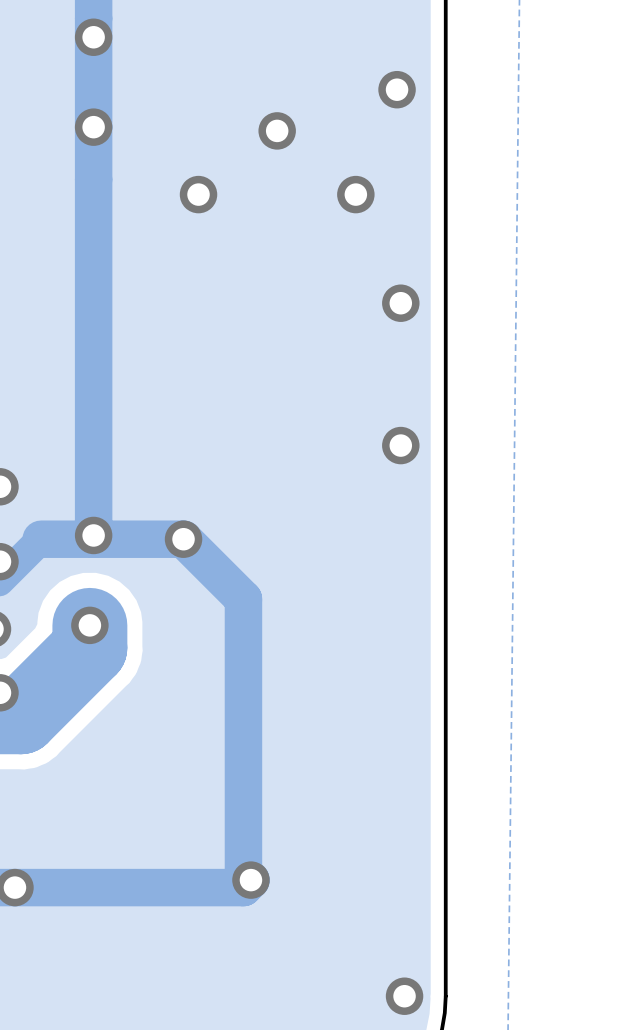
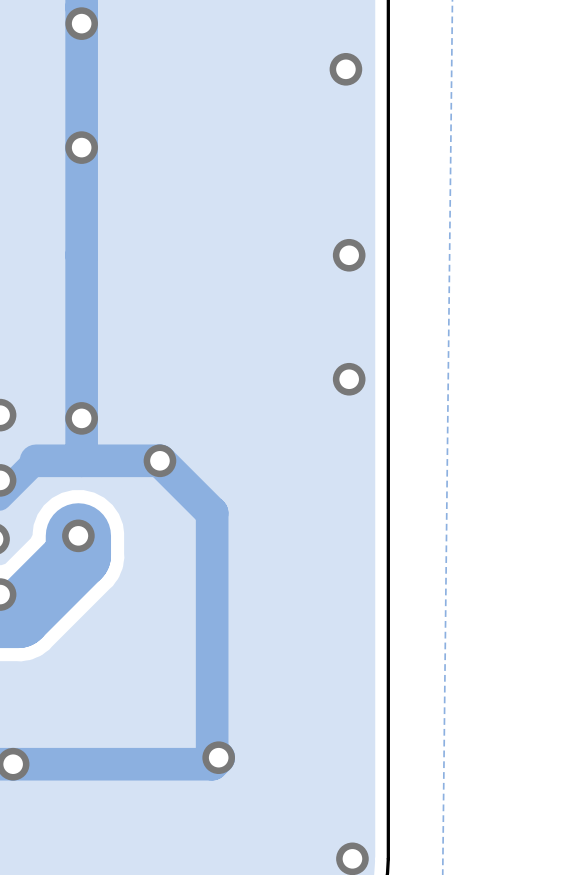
via: (93, 127) -> none
via: (277, 130) -> none
via: none -> (81, 147)
via: (198, 194) -> none
via: (355, 194) -> none
via position: (93, 535) -> (81, 418)

